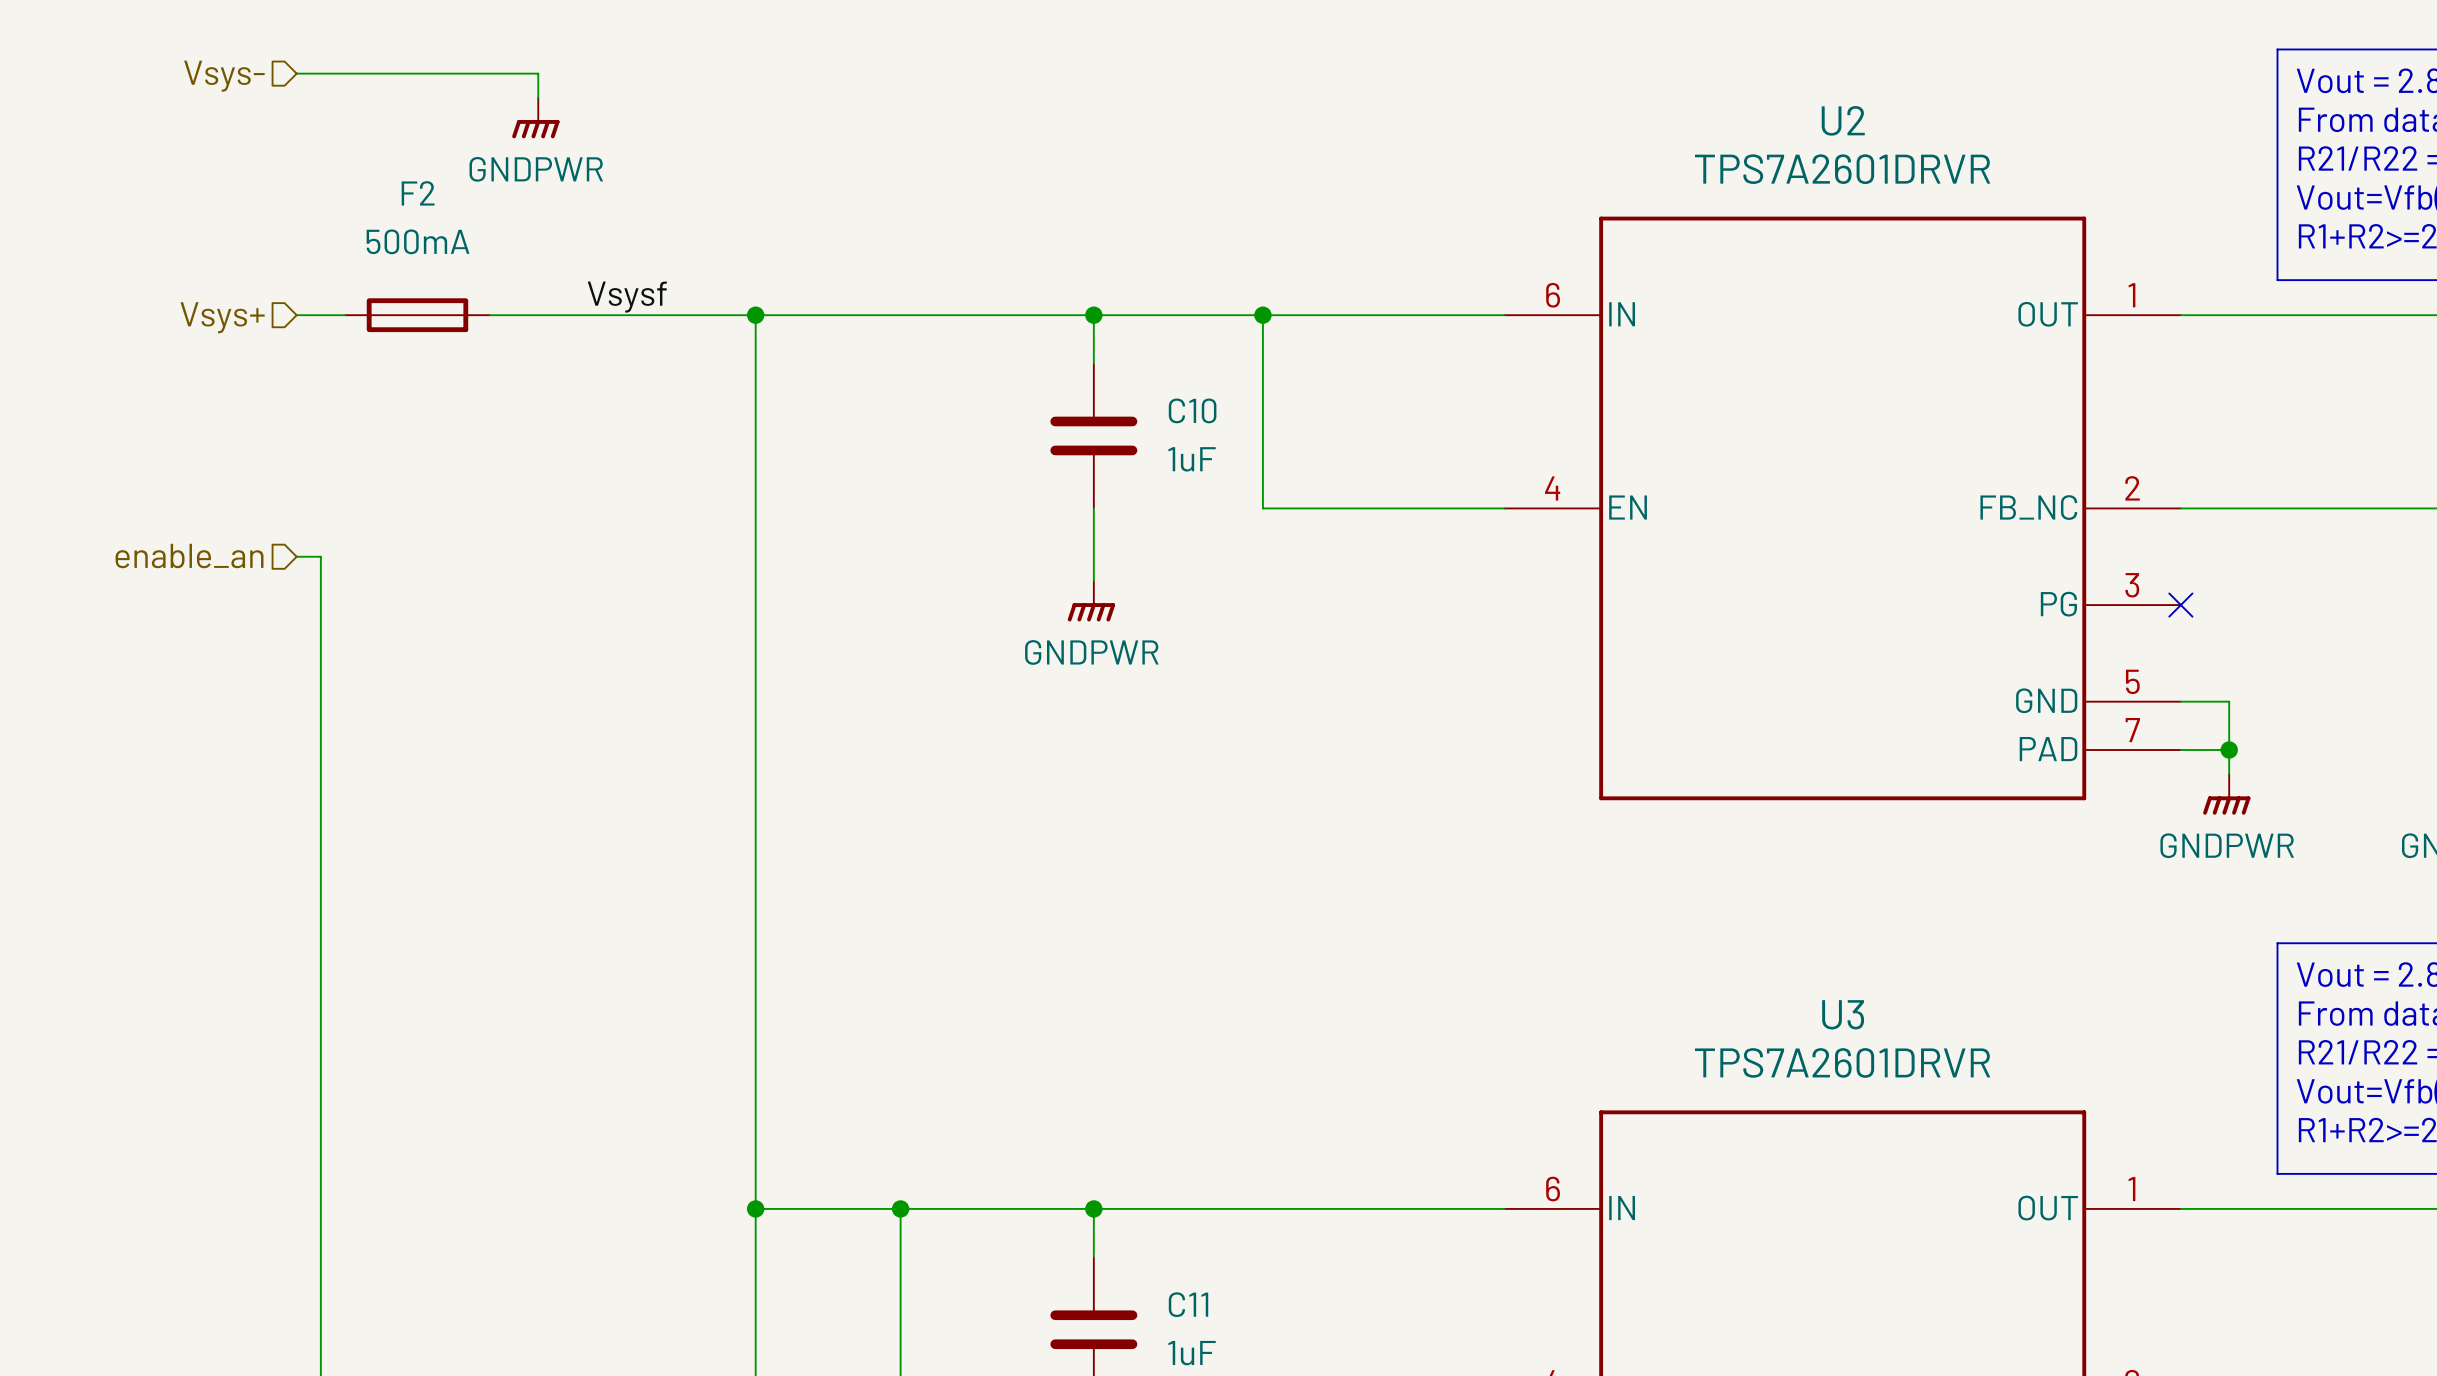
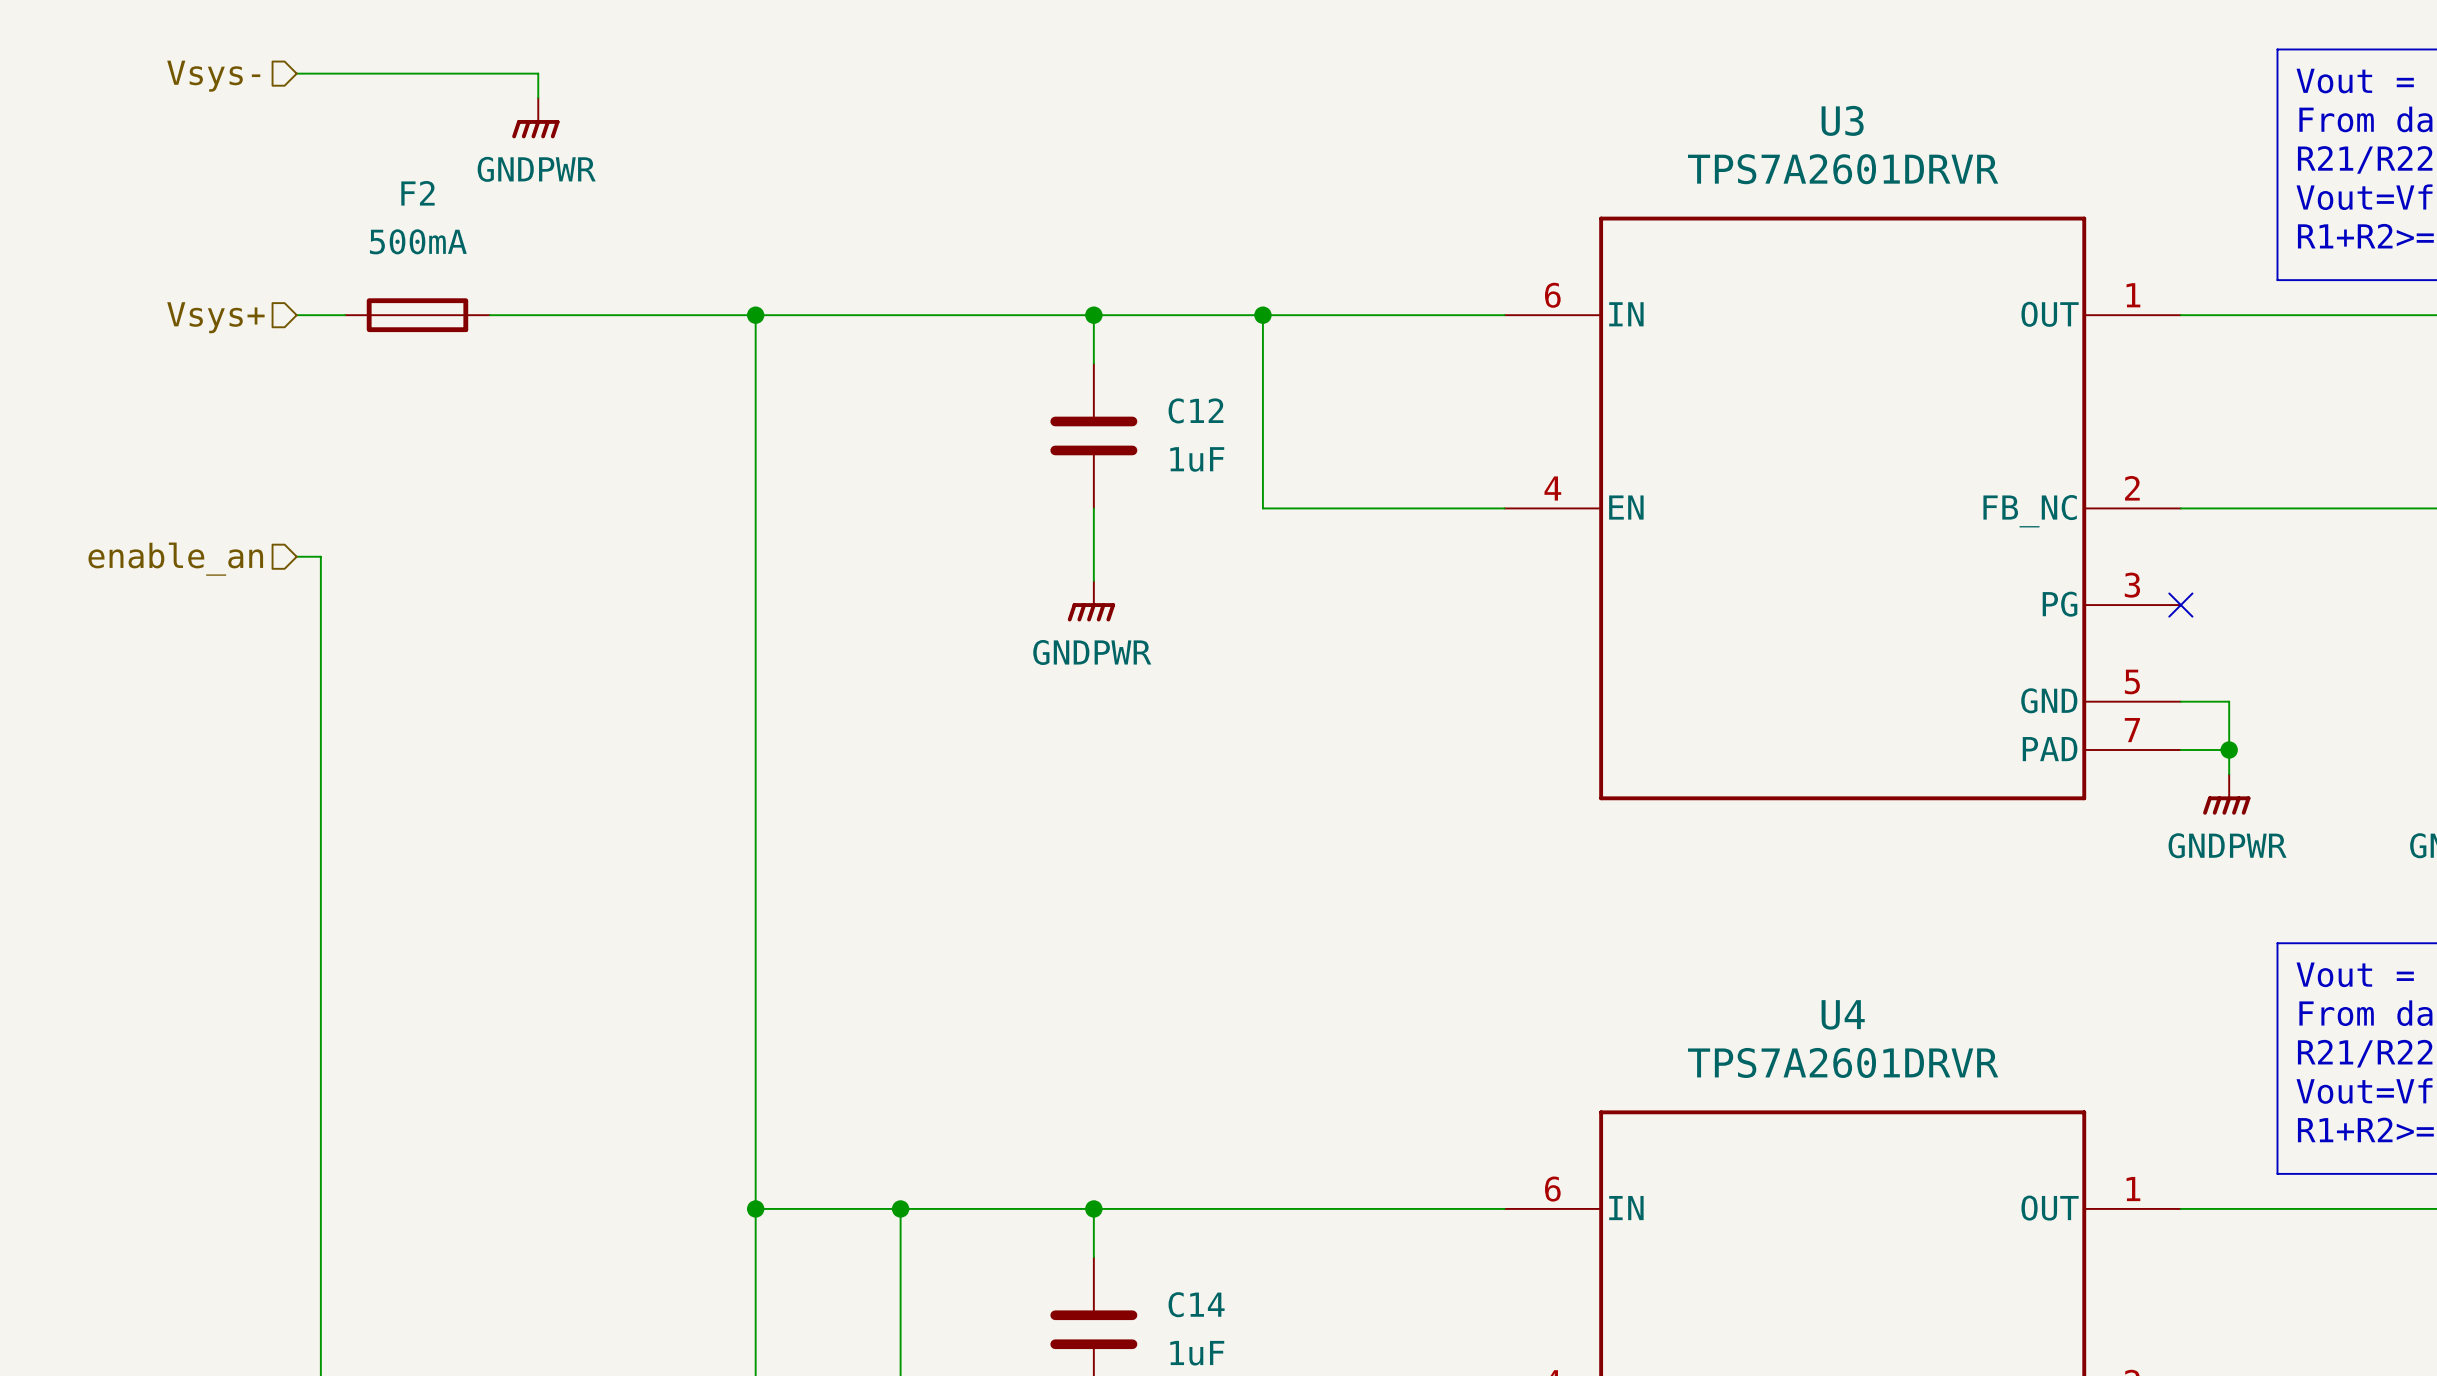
U2 name: U2 (1843, 120) -> U3 (1842, 120)
label: Vsysf (627, 297) -> none
C10 name: C10 (1192, 410) -> C12 (1195, 410)
U3 name: U3 (1843, 1014) -> U4 (1843, 1014)
C11 name: C11 (1188, 1304) -> C14 (1196, 1304)

